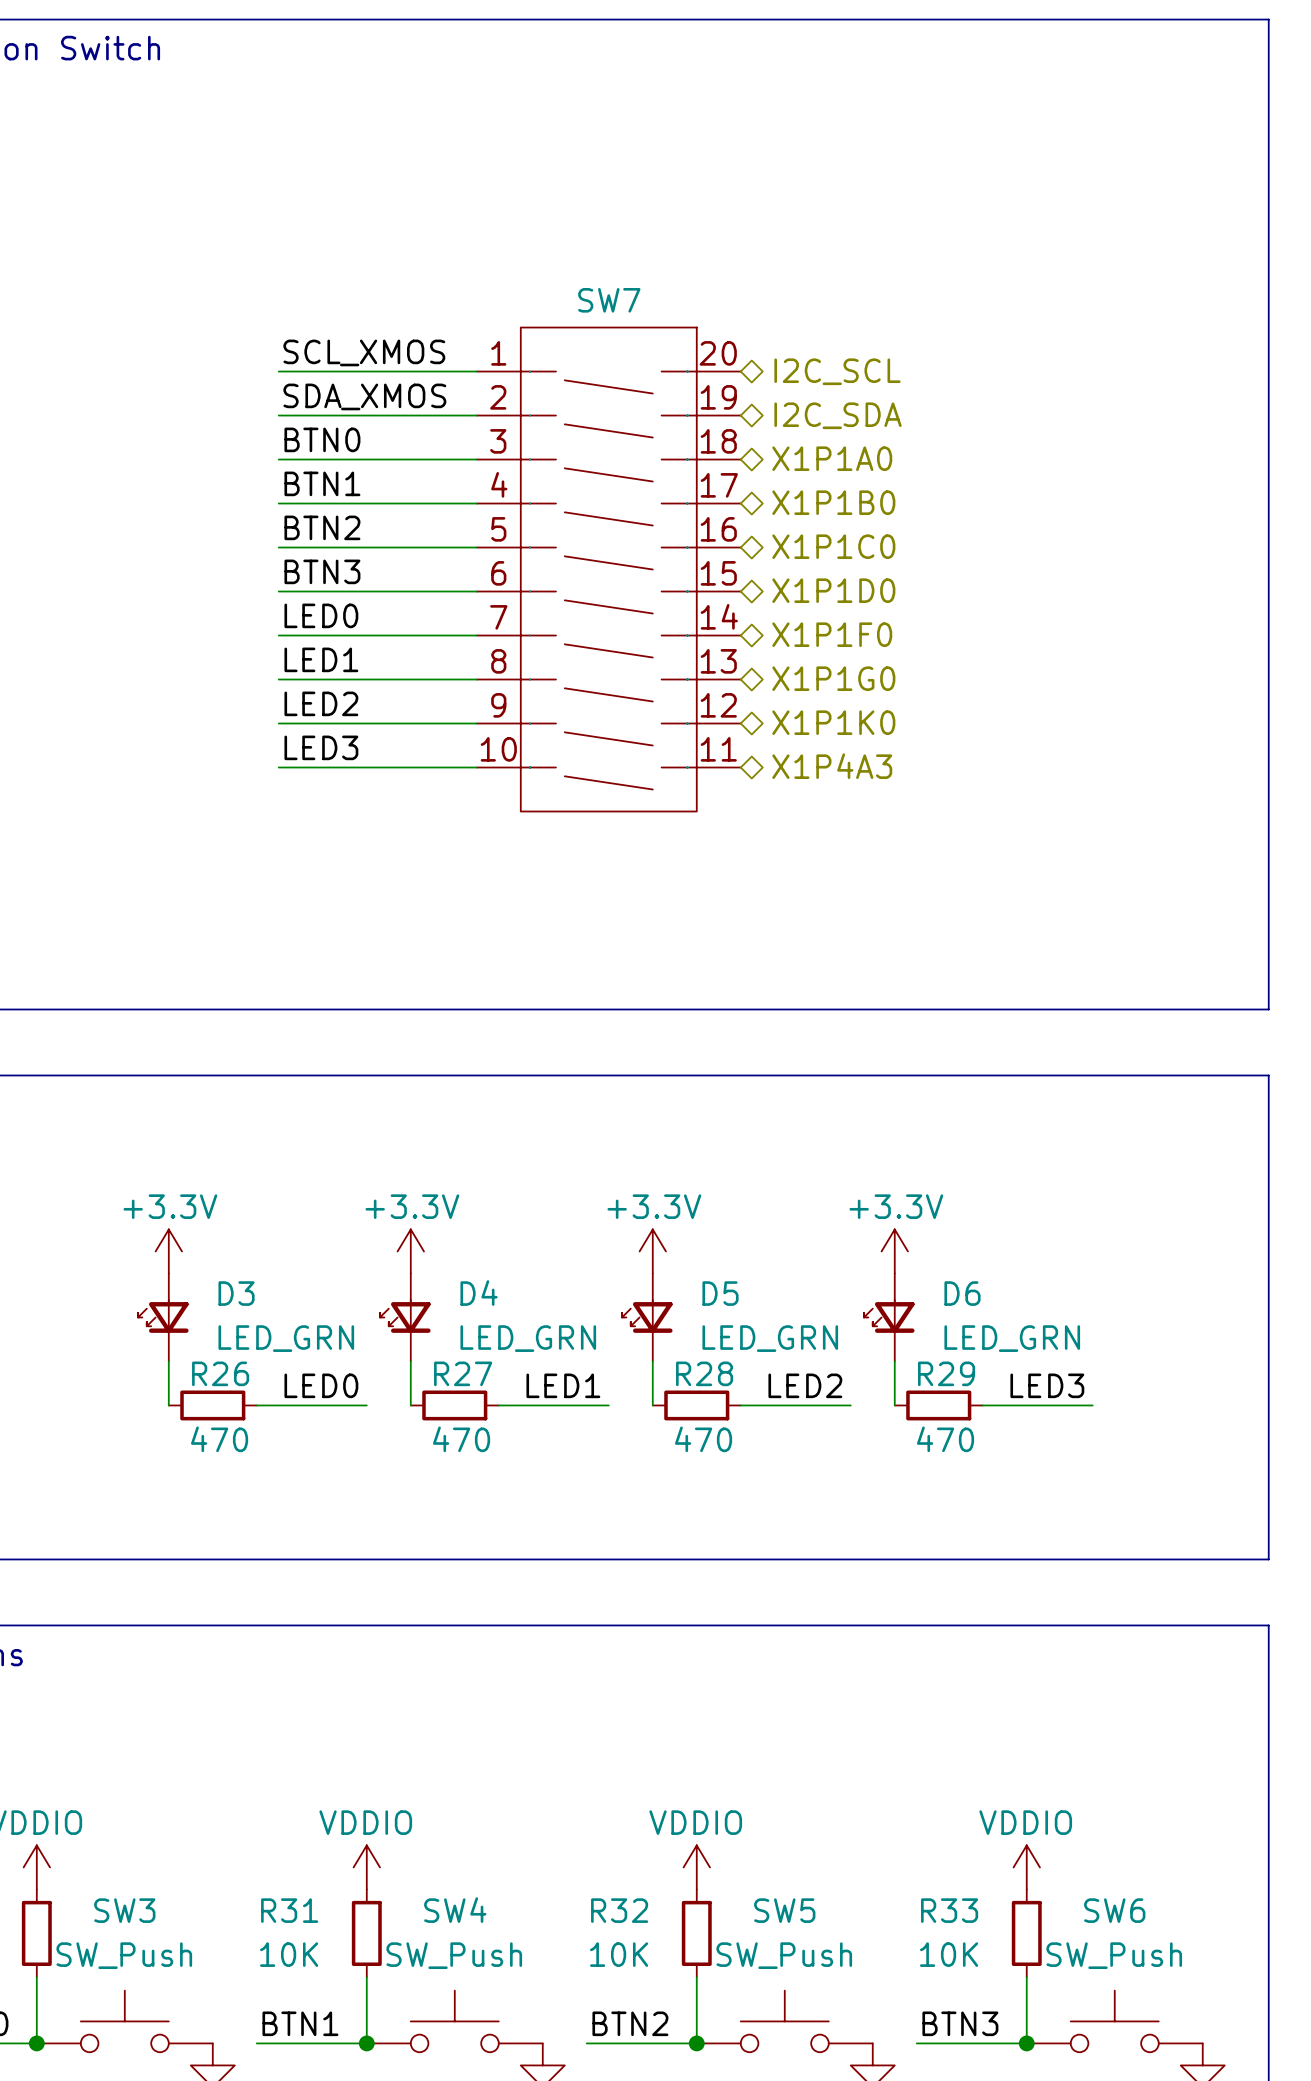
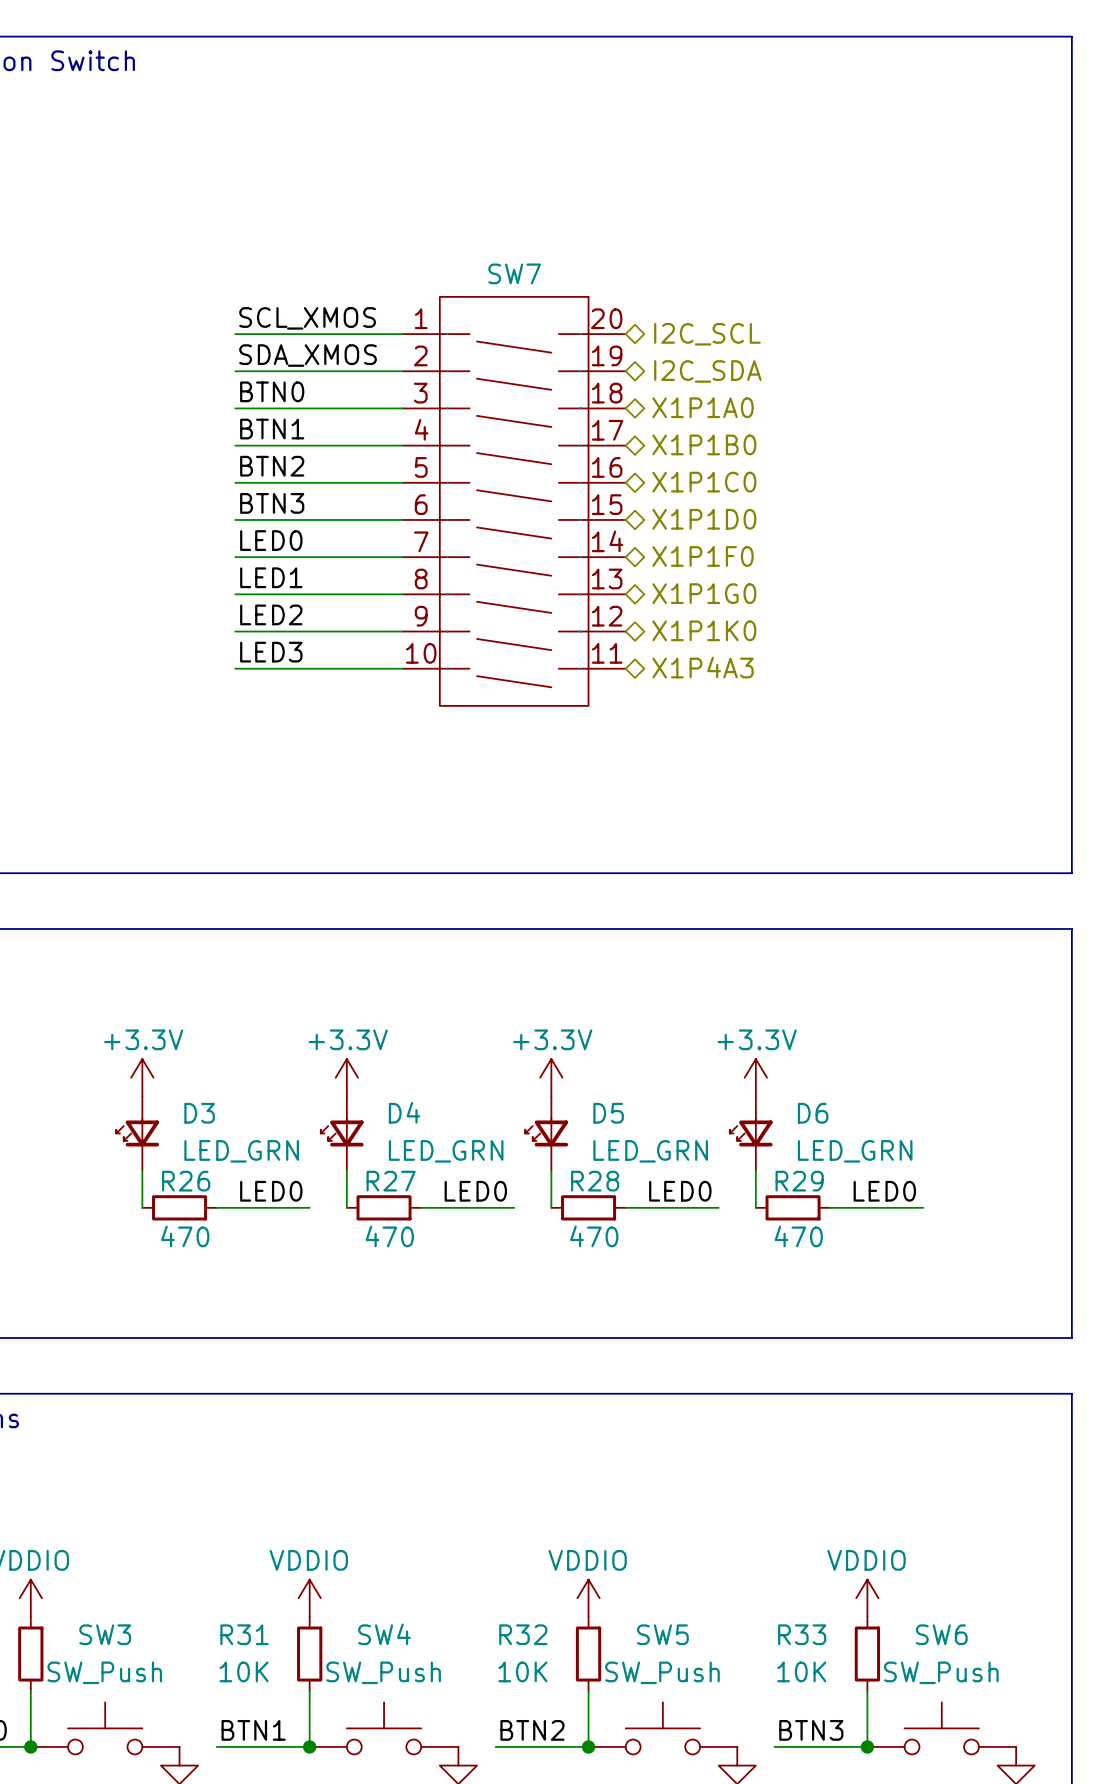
label: LED1 (563, 1385) -> LED0 (475, 1191)
label: LED2 (805, 1385) -> LED0 (680, 1191)
label: LED3 (1047, 1385) -> LED0 (884, 1191)

